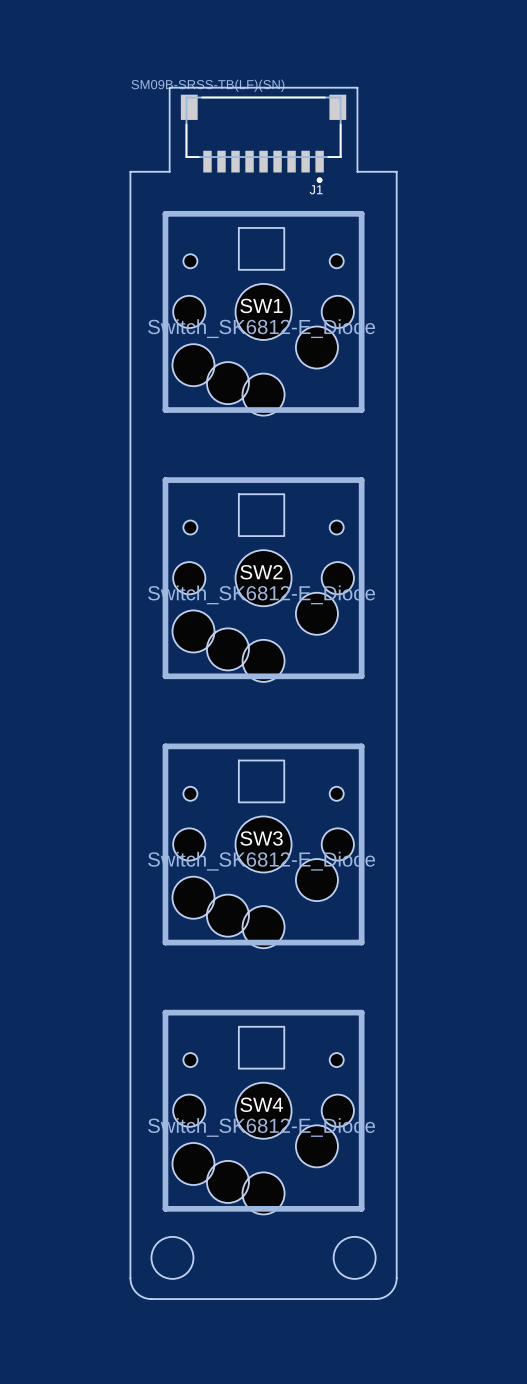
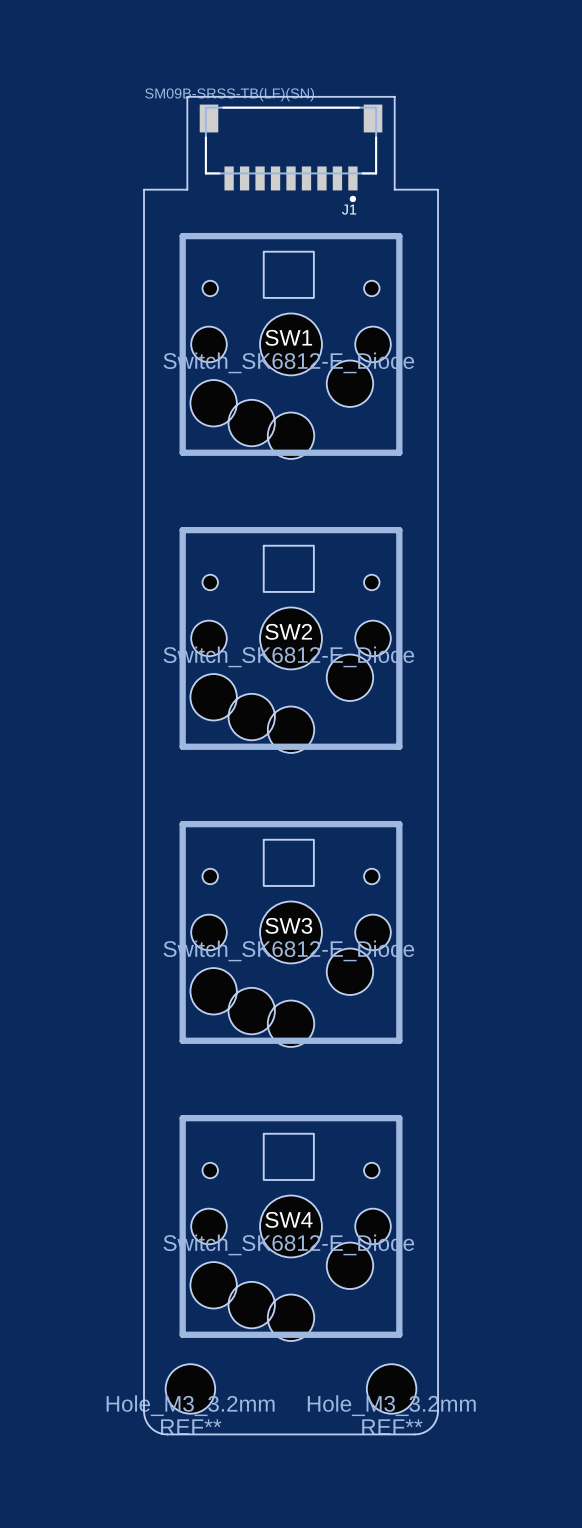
round board edge: [150, 1236, 195, 1280] -> none
round board edge: [332, 1236, 377, 1280] -> none
REF**: none -> Hole_M3_3.2mm (190, 1388)
REF**: none -> Hole_M3_3.2mm (391, 1388)

